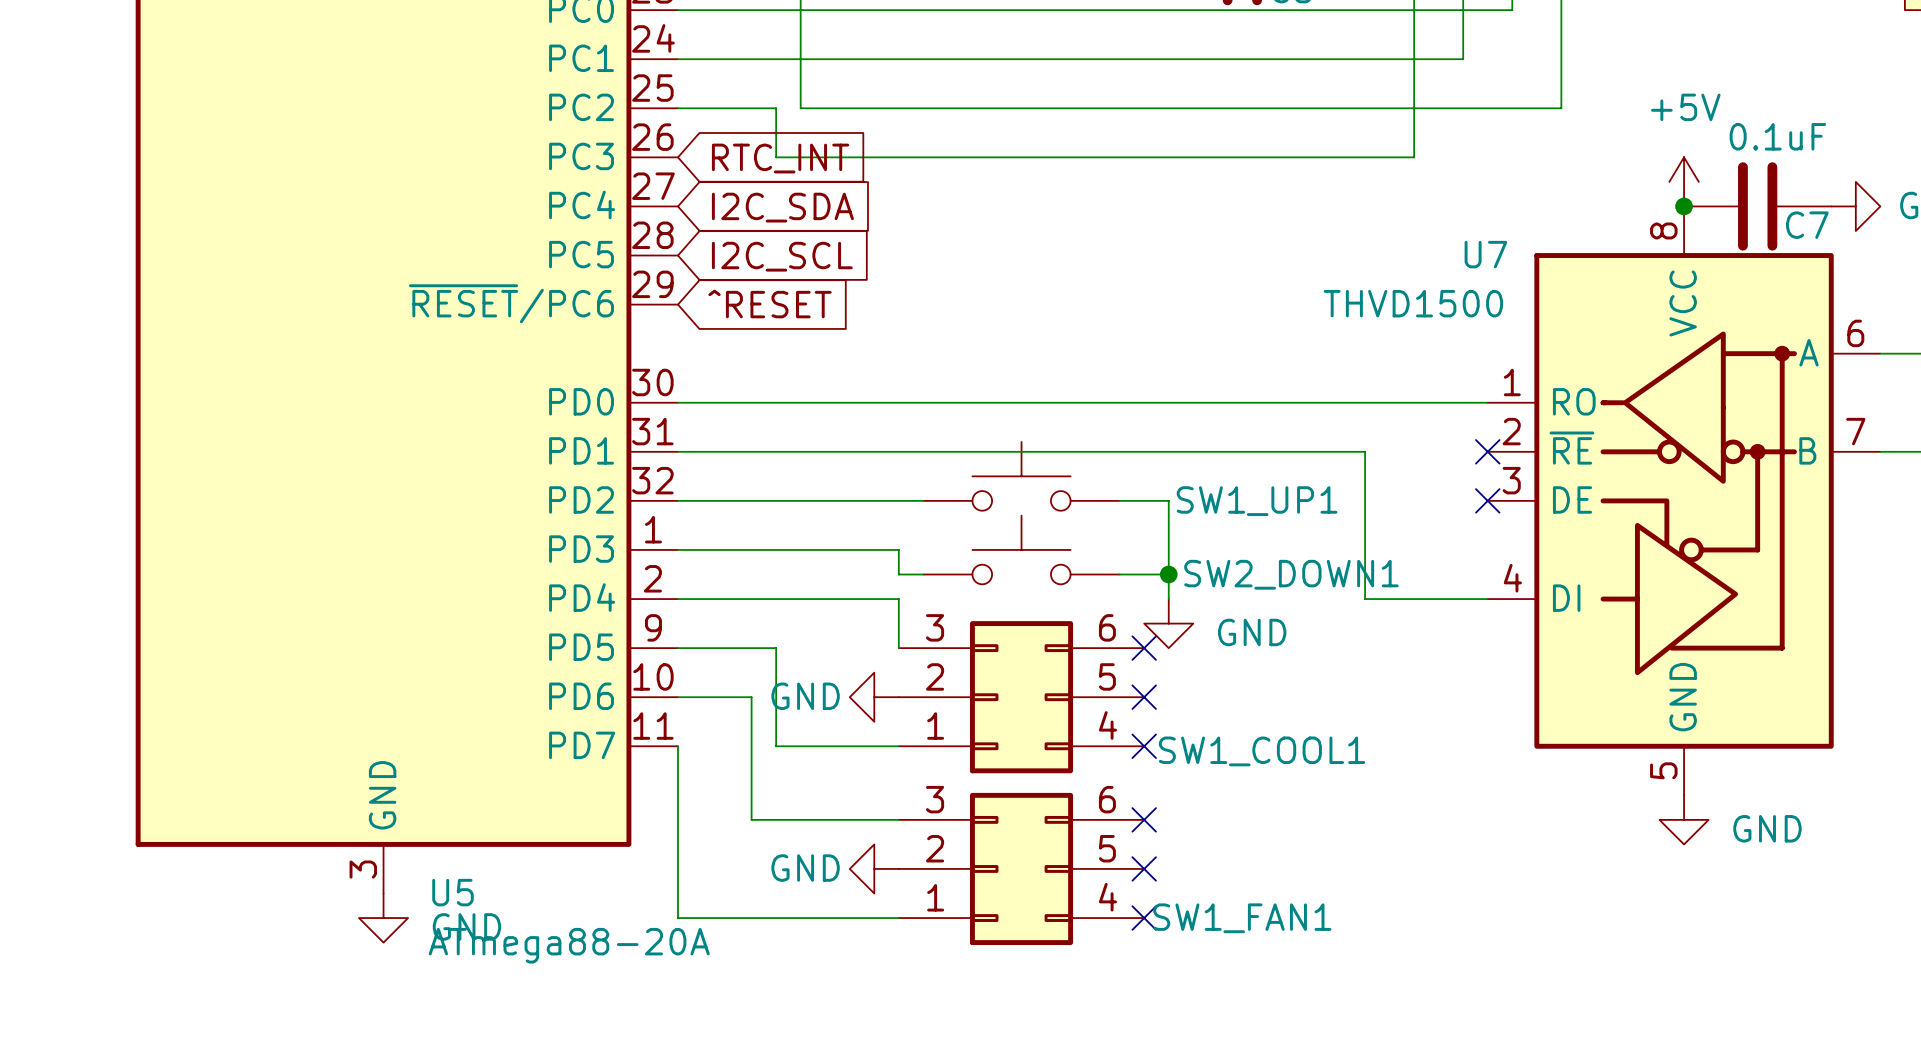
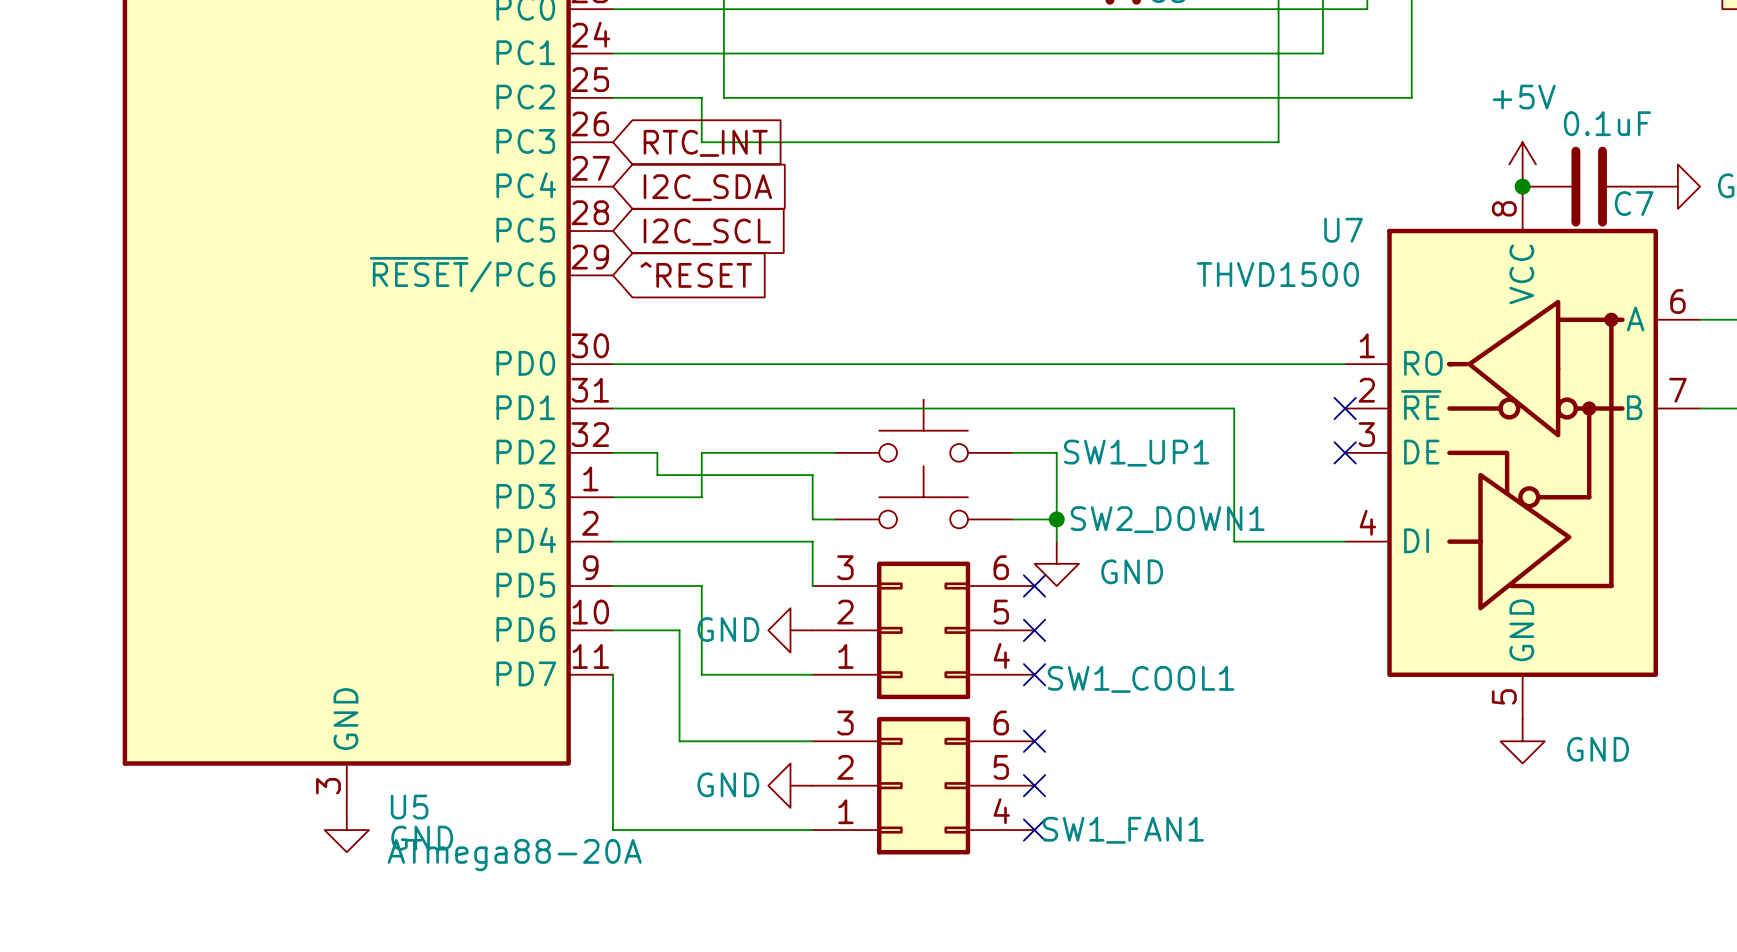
wire: (727, 500) (776, 500) -> (701, 497) (701, 452)
wire: (776, 549) (898, 549) -> (657, 452) (657, 475) (812, 475) (812, 497)

